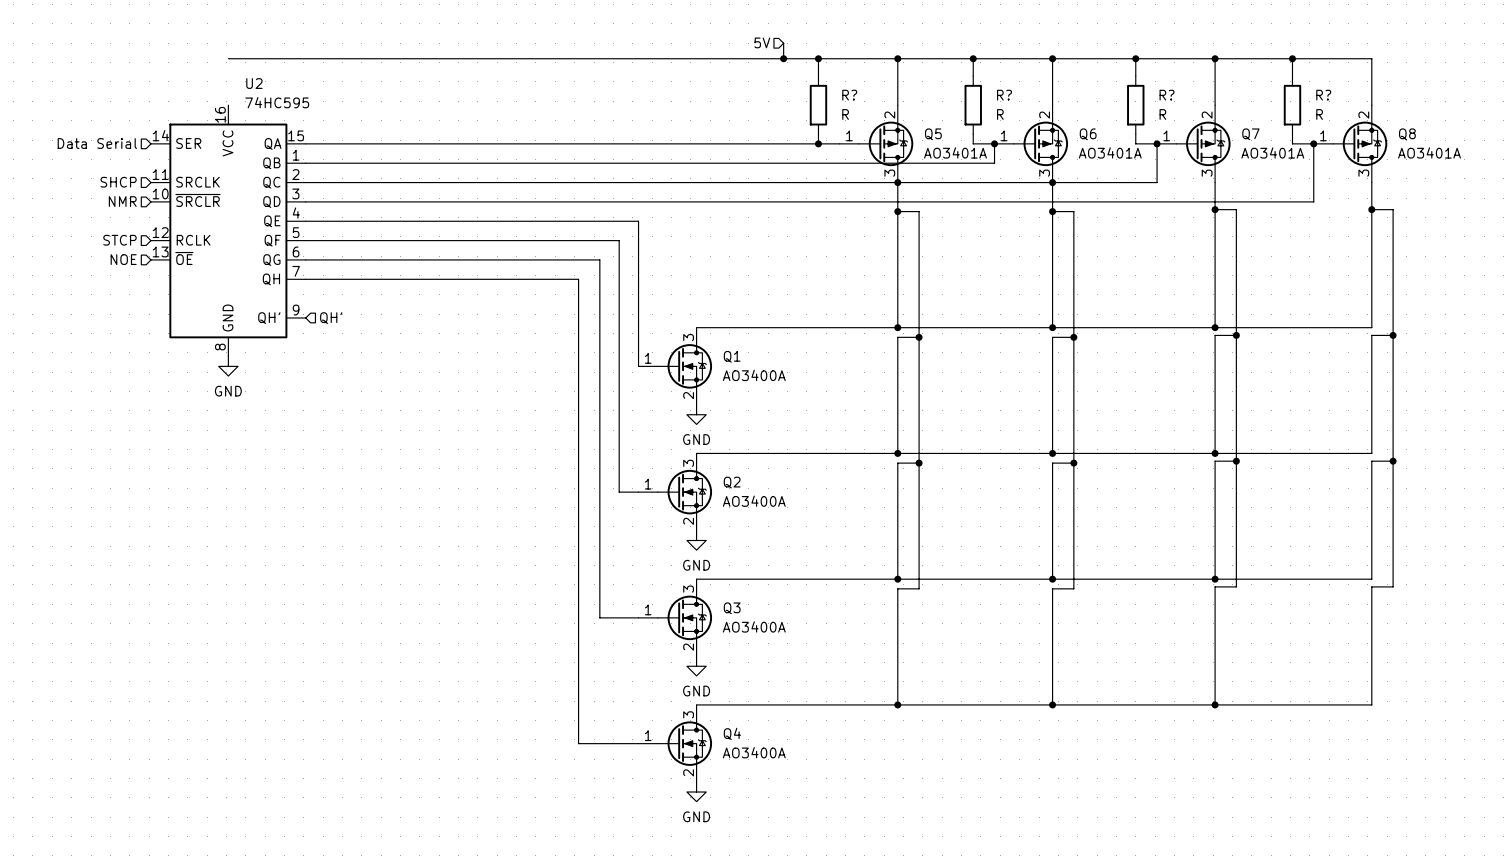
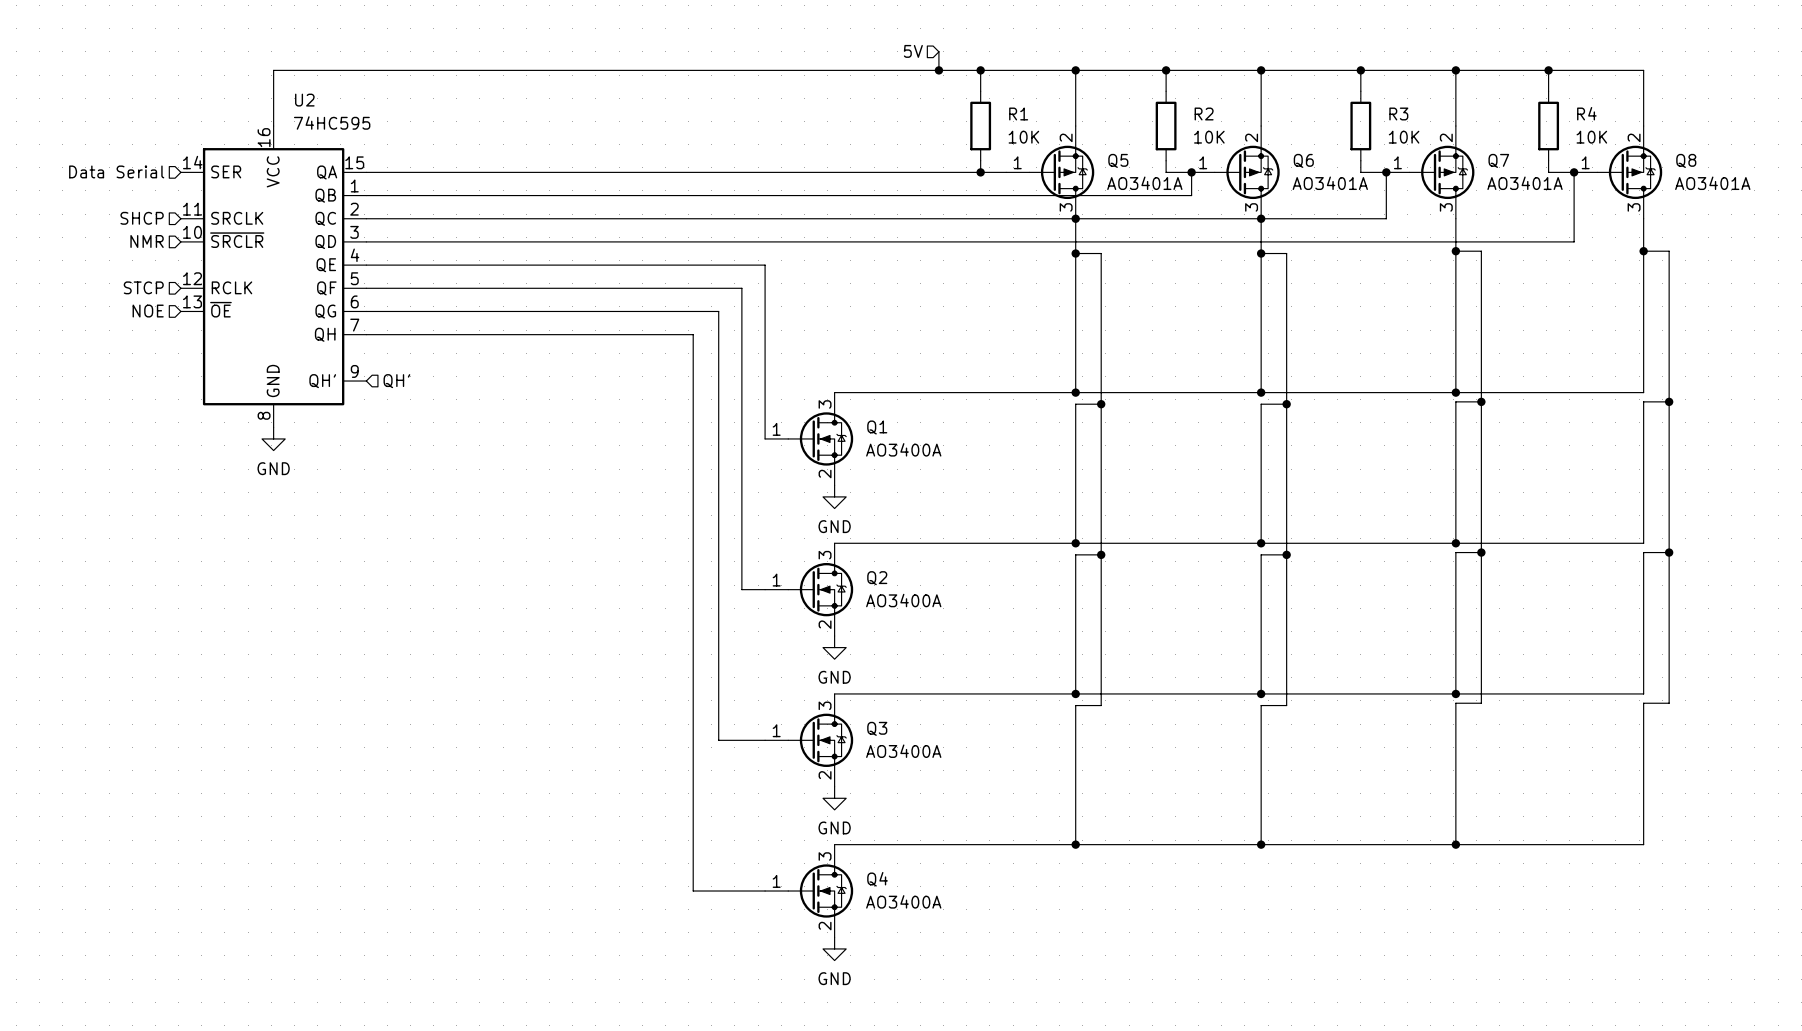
wire: none -> (273, 70) (273, 126)
R? name: R? (849, 95) -> R1 (1018, 113)
R? name: R? (1004, 95) -> R2 (1204, 113)
R? name: R? (1167, 95) -> R3 (1398, 113)
R? name: R? (1323, 95) -> R4 (1586, 113)
R? value: R (845, 114) -> 10K (1023, 137)
R? value: R (1000, 114) -> 10K (1209, 137)
R? value: R (1162, 114) -> 10K (1404, 137)
R? value: R (1319, 114) -> 10K (1591, 137)

